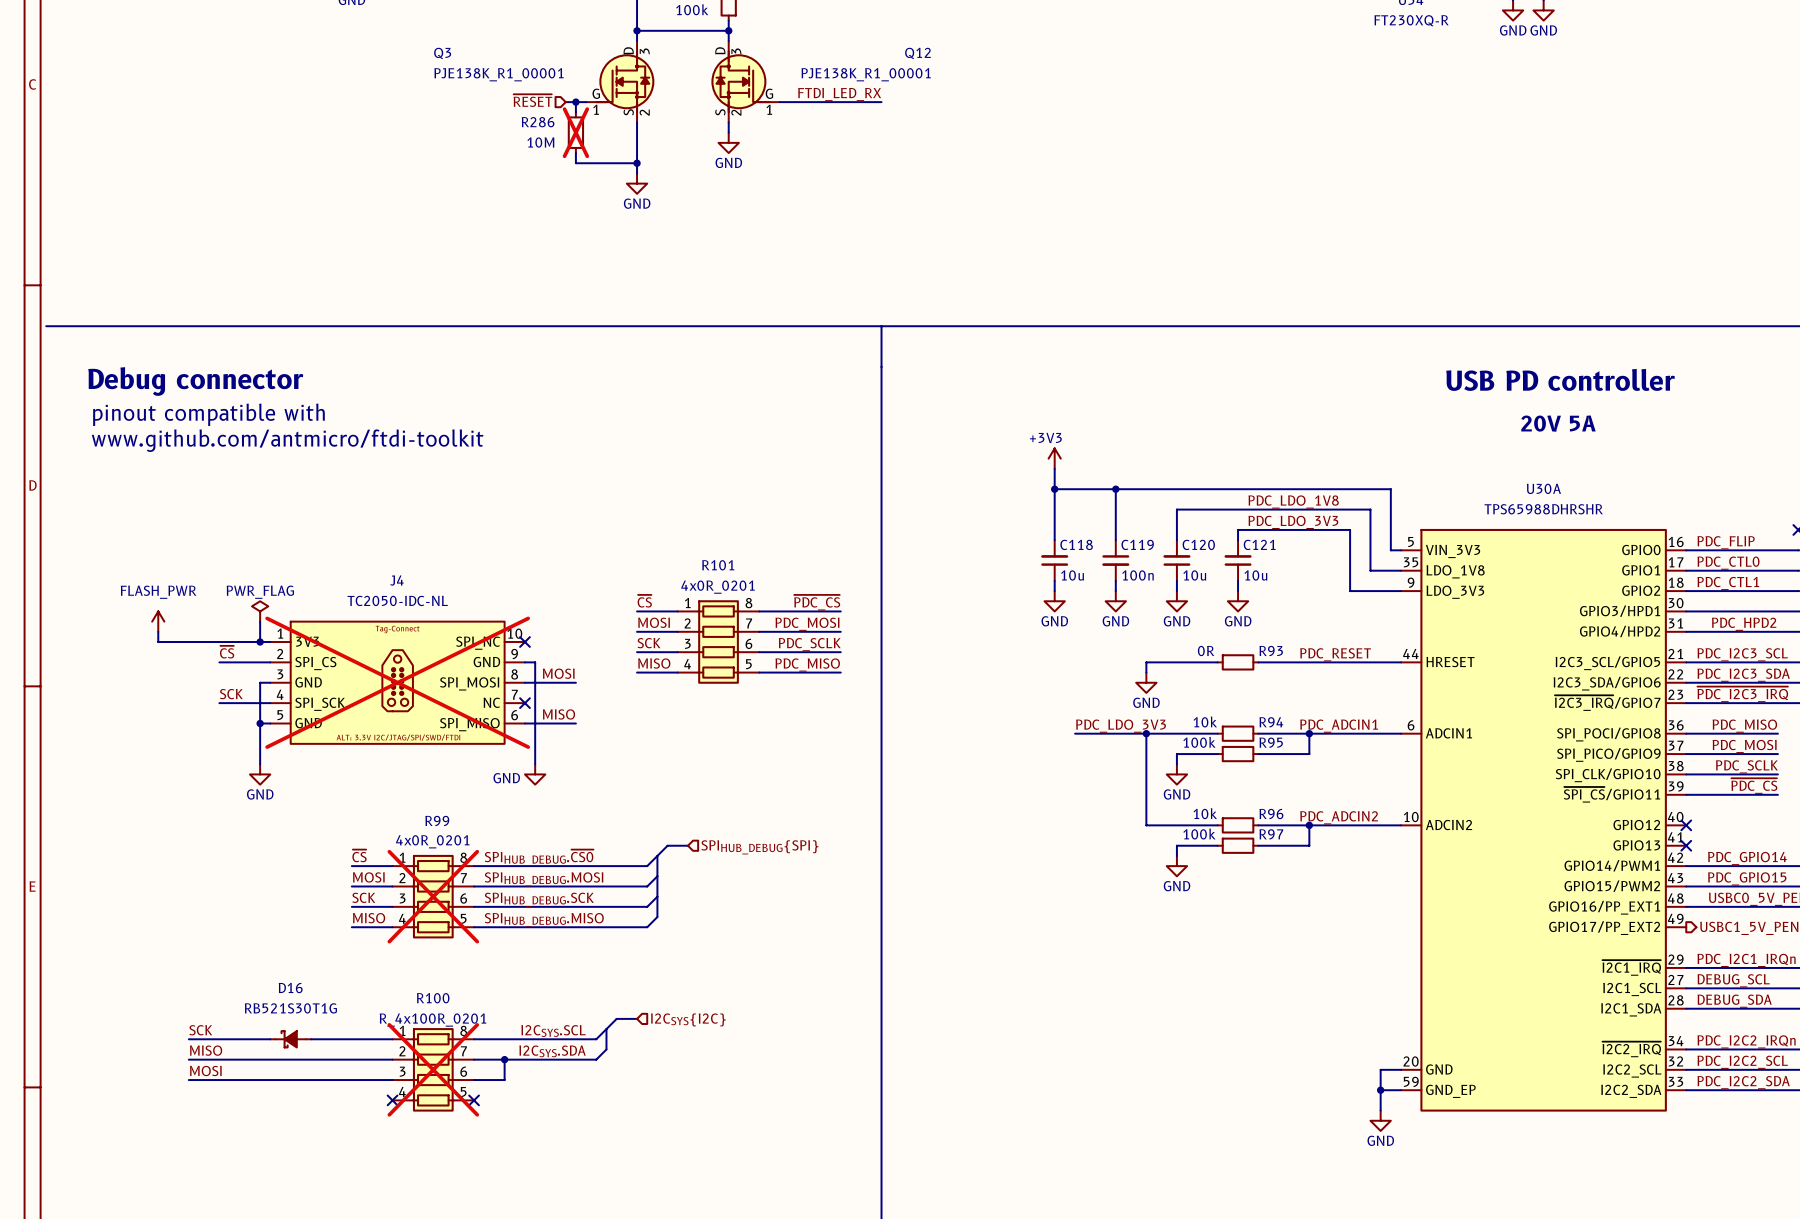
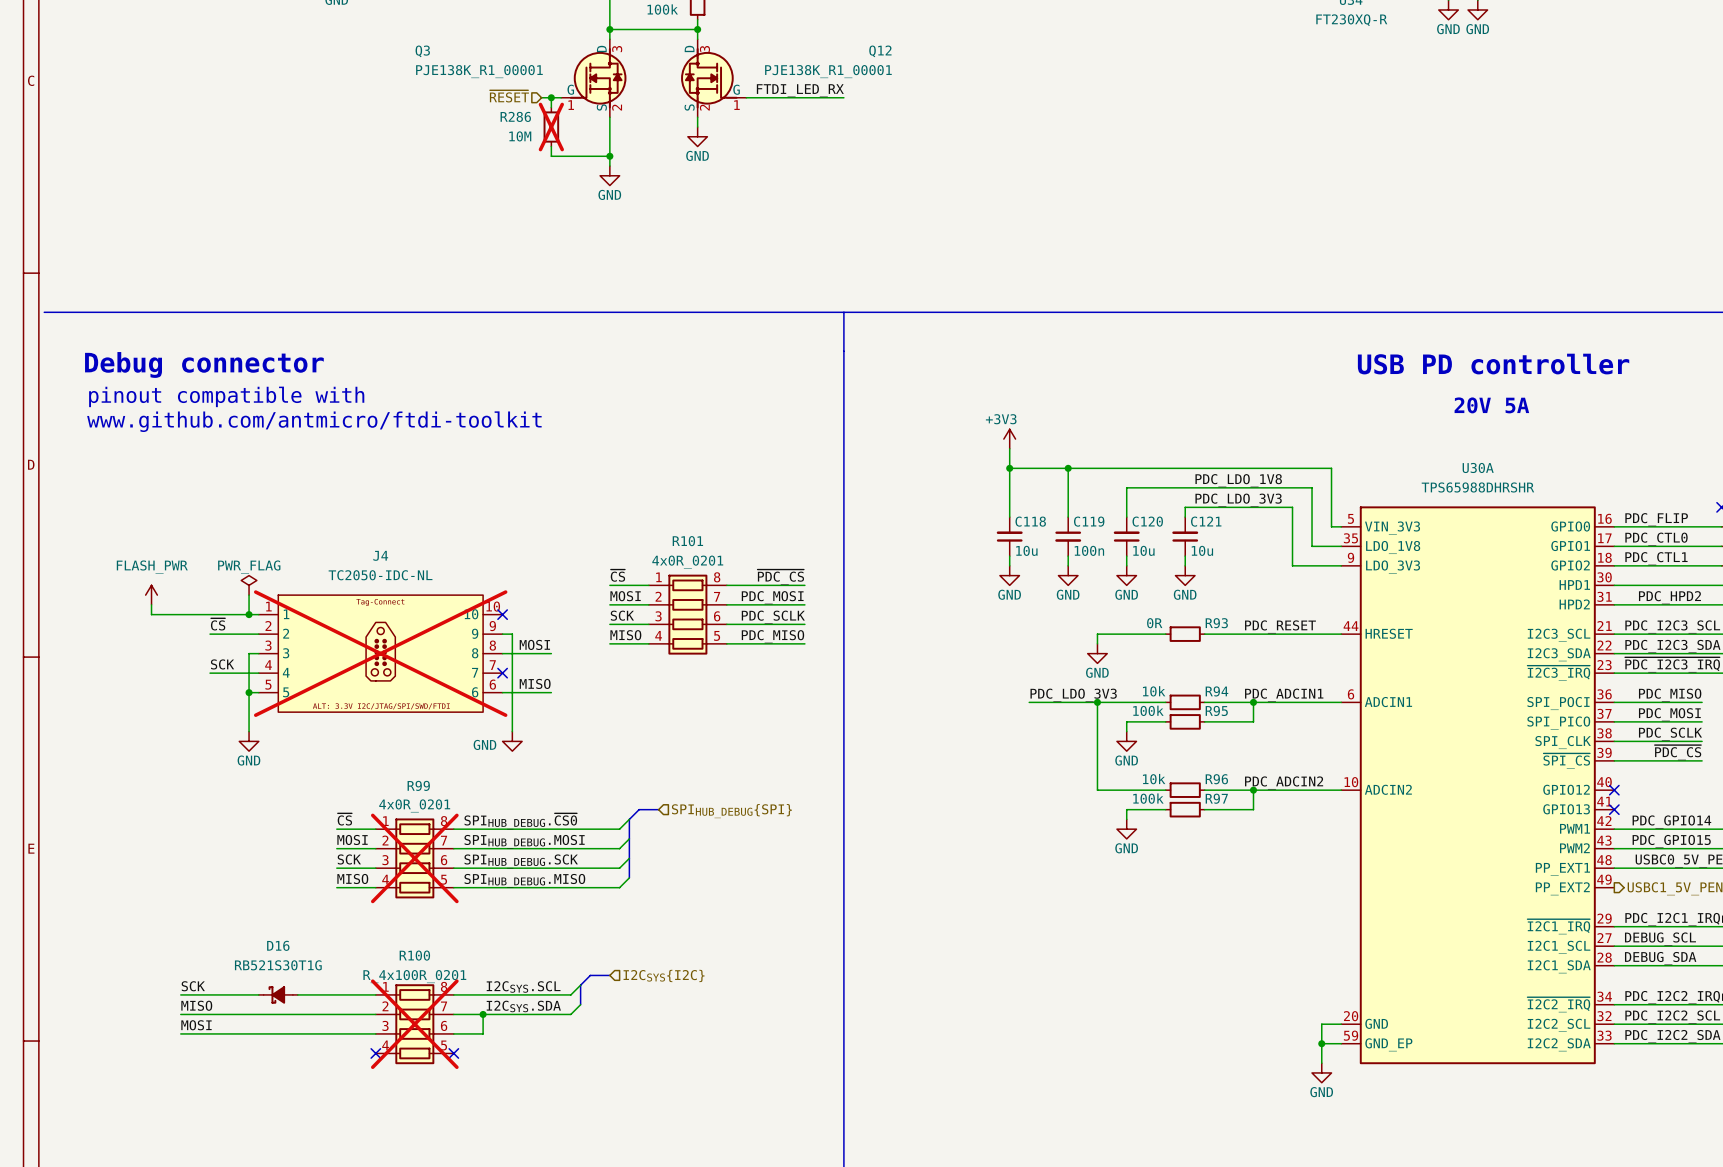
U30A symbol: [1401, 528, 1687, 1112] -> [1341, 506, 1615, 1065]
J4 symbol: [270, 621, 525, 744] -> [258, 595, 503, 713]

